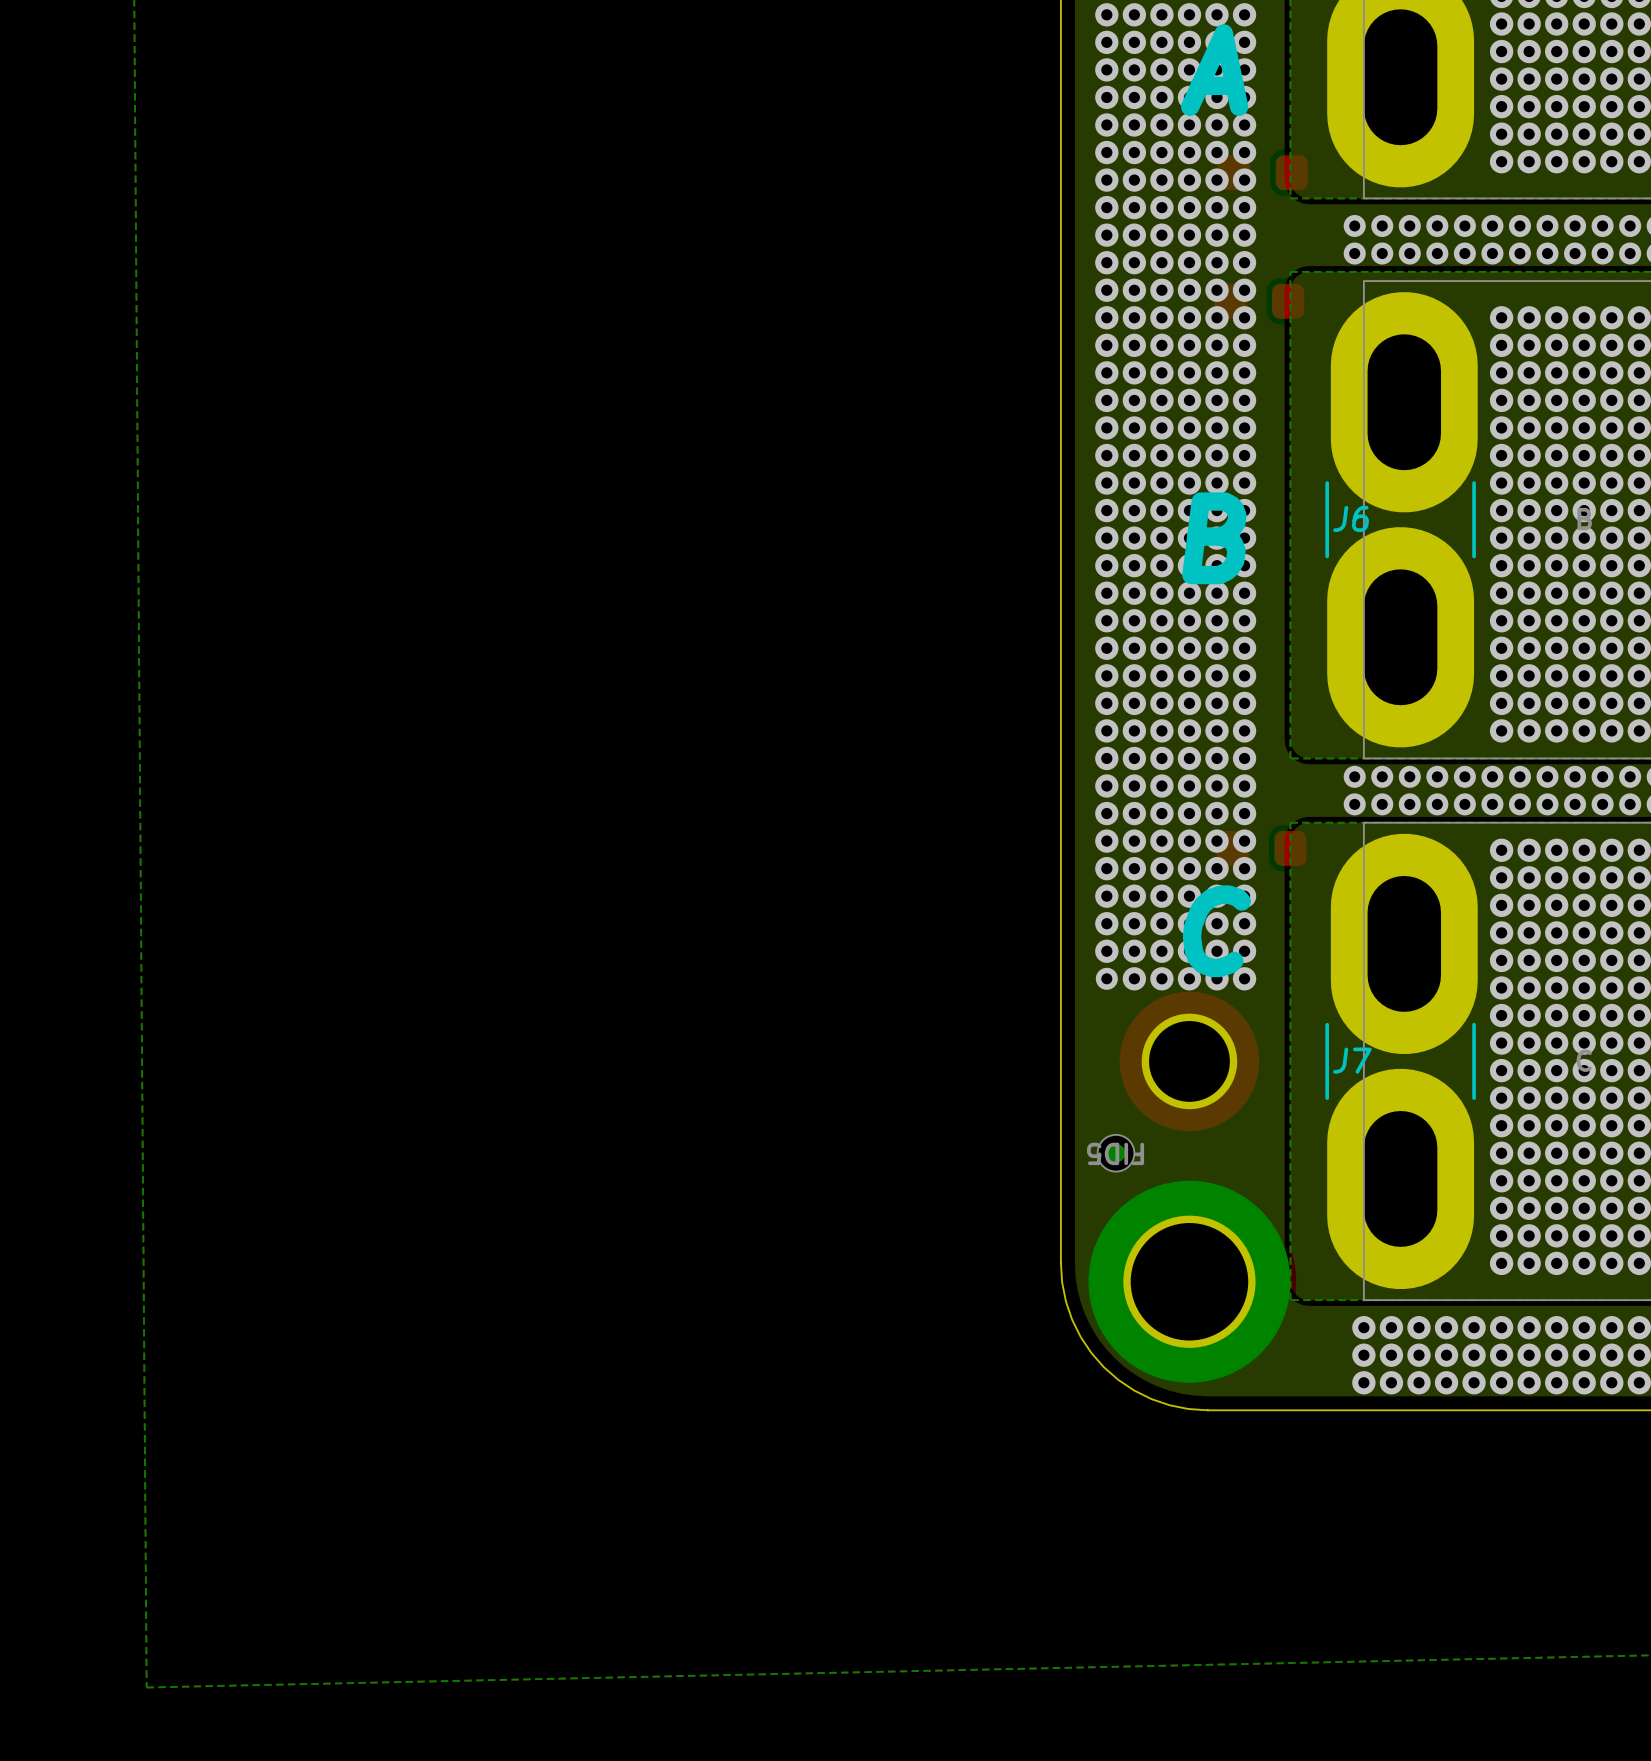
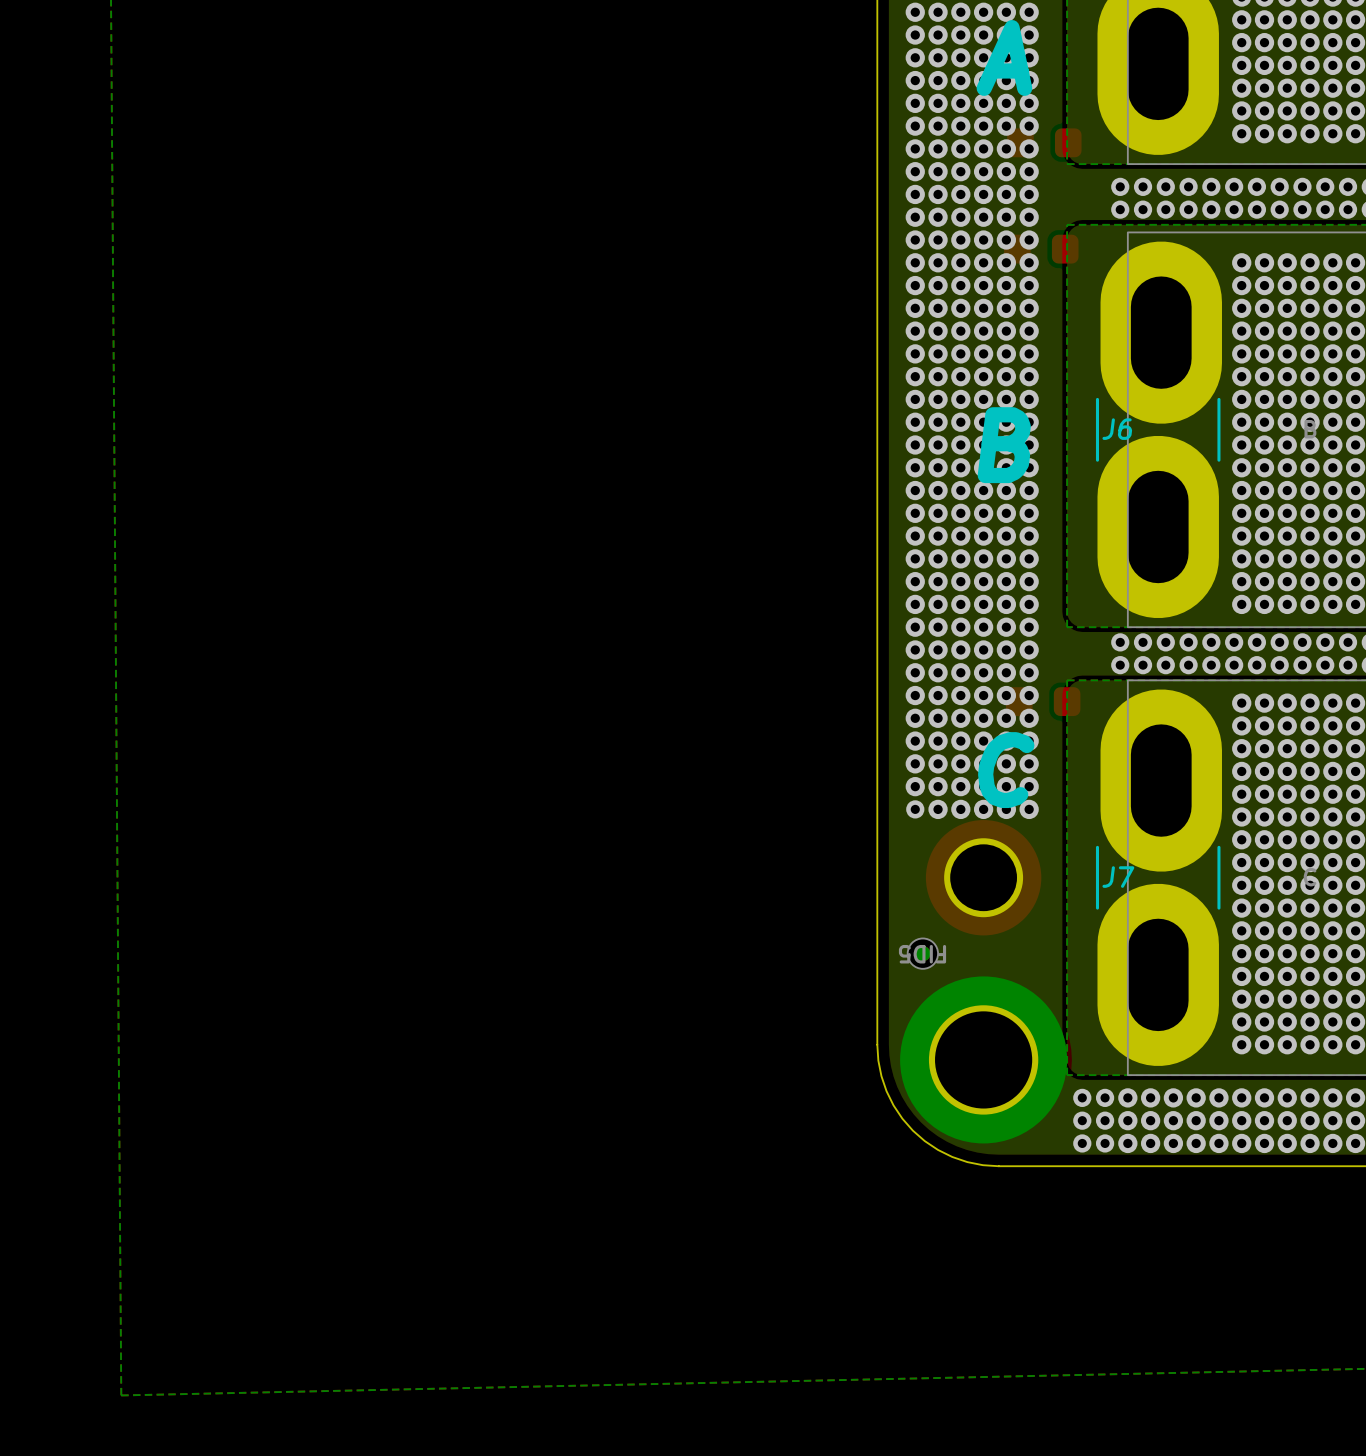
via: none -> (1082, 1097)
via: none -> (1105, 1097)
via: none -> (1082, 1120)
via: none -> (1105, 1120)
via: none -> (1082, 1143)
via: none -> (1105, 1143)

